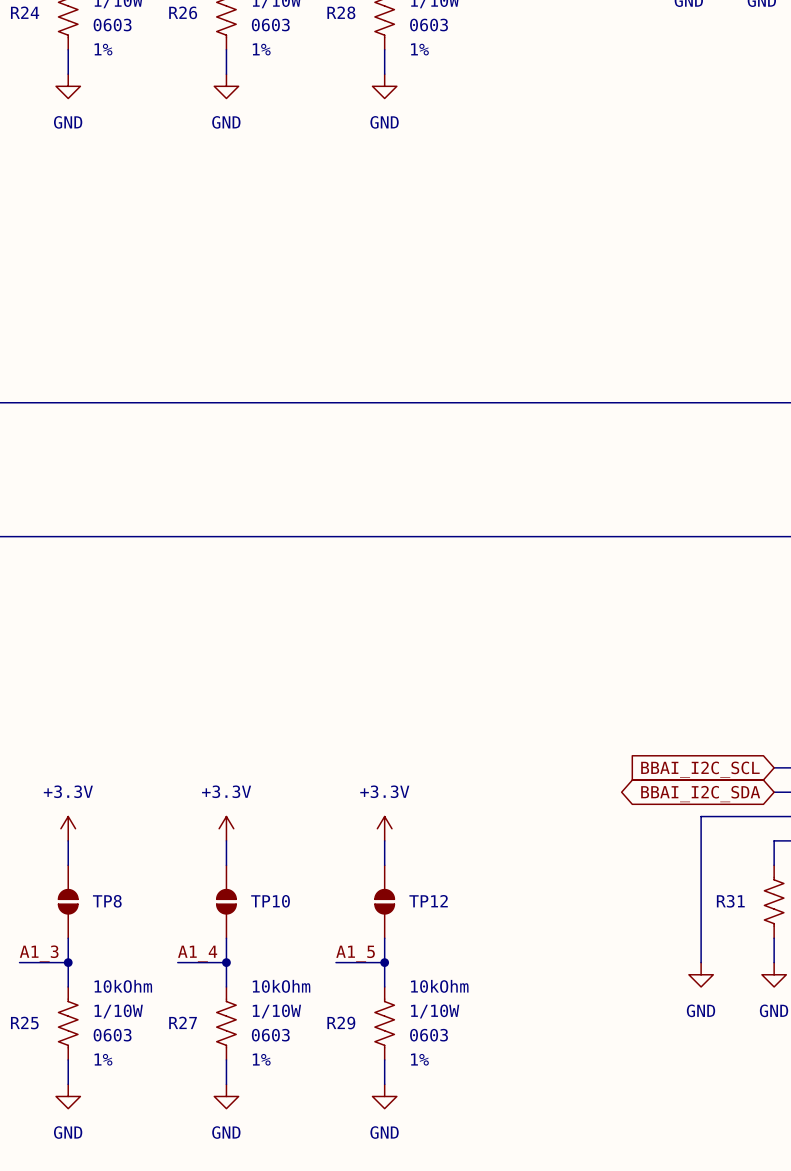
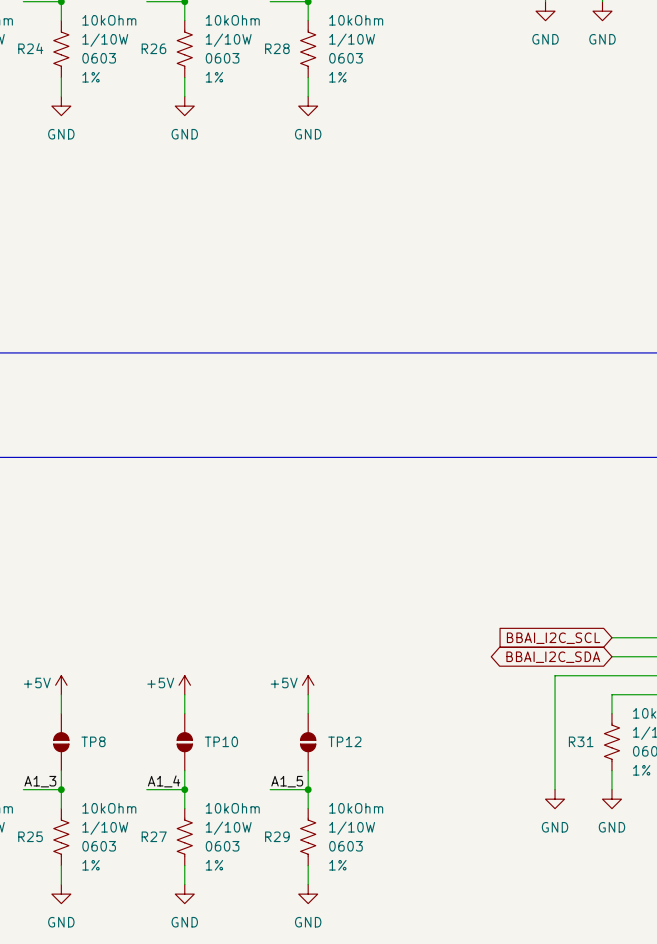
power symbol: +3.3V (68, 828) -> +5V (61, 685)
power symbol: +3.3V (226, 828) -> +5V (184, 685)
power symbol: +3.3V (384, 828) -> +5V (308, 685)

